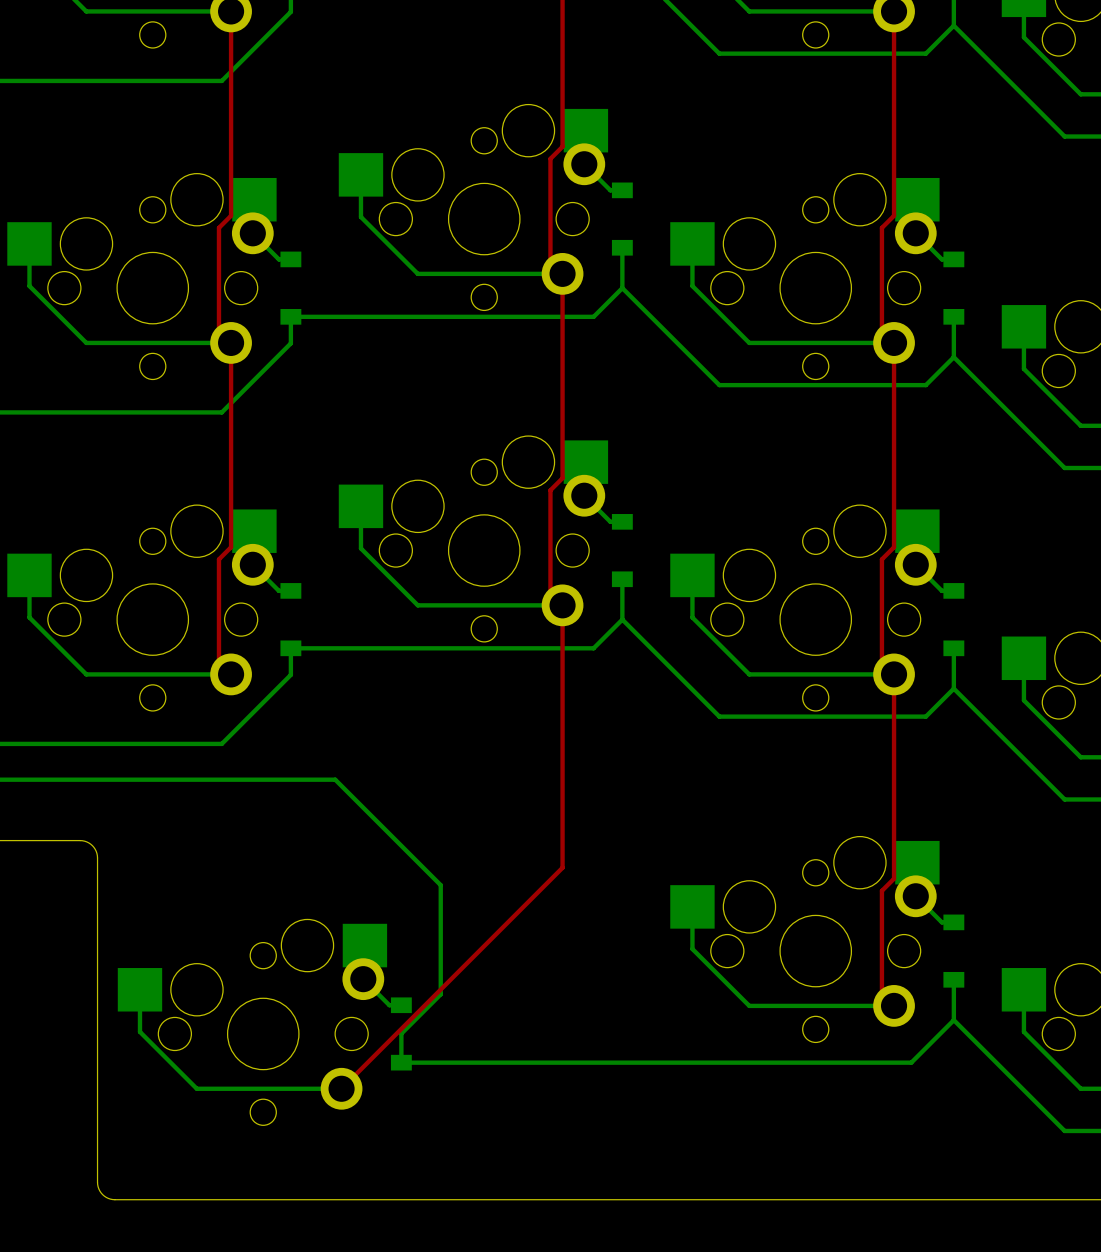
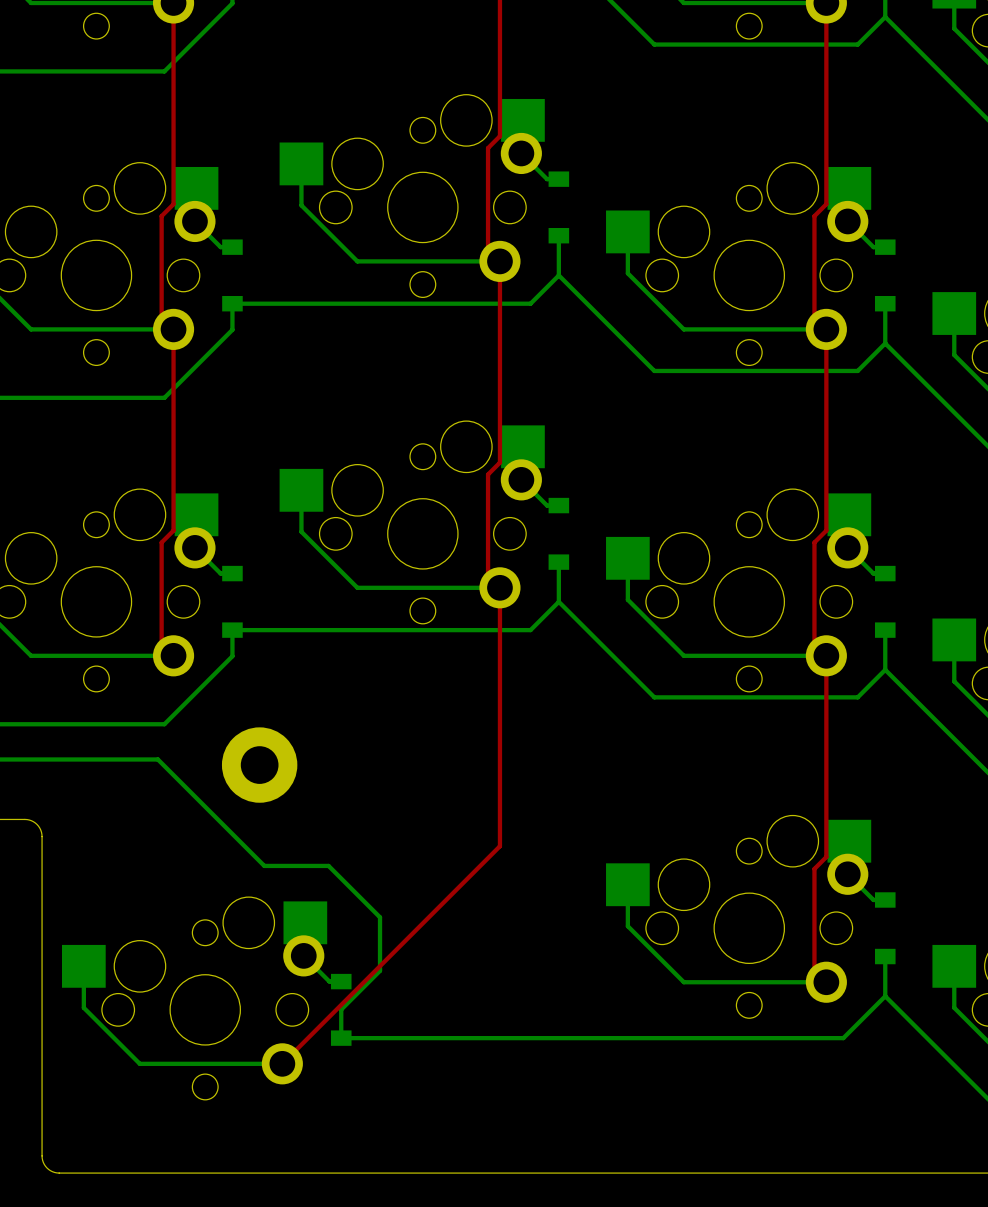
bottom track: (215, 779) (335, 779) (440, 885) (440, 939) -> (157, 759) (264, 865) (328, 865) (380, 917)
part: none -> (259, 765)

